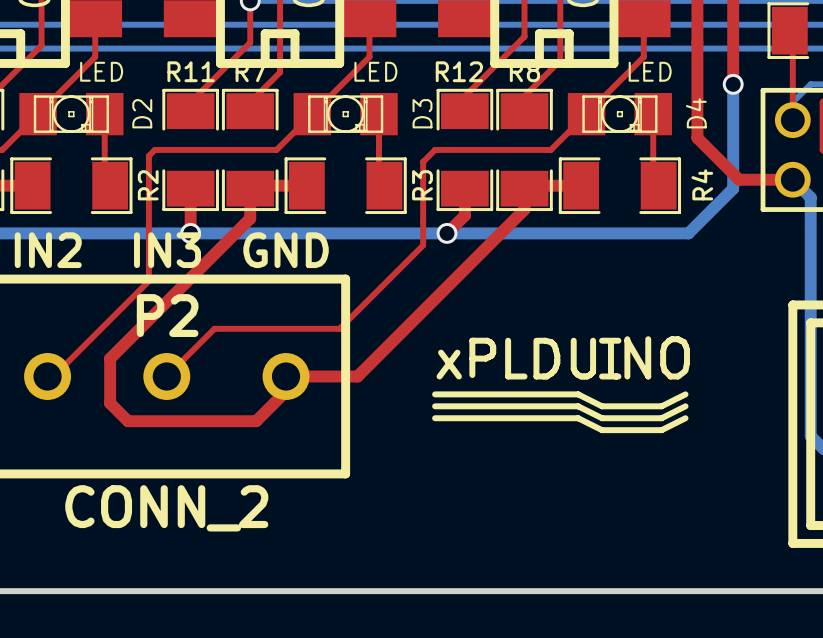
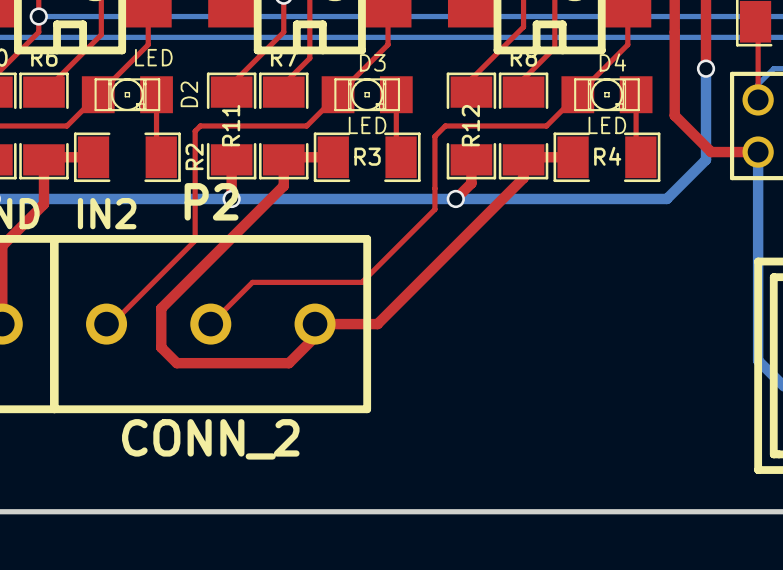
R11 name rotation: 0° (191, 71) -> 90° counterclockwise (231, 125)
R11 name position: R11 (191, 71) -> R11 (231, 125)
D3 value position: LED (375, 71) -> LED (367, 125)
R12 name rotation: 0° (459, 71) -> 90° counterclockwise (470, 125)
R12 name position: R12 (459, 71) -> R12 (470, 125)
D4 value position: LED (650, 71) -> LED (607, 125)
D3 name rotation: 0° (422, 113) -> 90° clockwise (372, 62)
D3 name position: D3 (422, 113) -> D3 (372, 62)
D4 name rotation: 0° (696, 113) -> 90° clockwise (612, 62)
D4 name position: D4 (696, 113) -> D4 (612, 62)
bottom track: (792, 179) (810, 197) (810, 436) -> (758, 152) (758, 360) (773, 376)
R4 name rotation: 0° (702, 184) -> 90° clockwise (607, 156)
R4 name position: R4 (702, 184) -> R4 (607, 156)
R3 name rotation: 0° (422, 185) -> 90° clockwise (367, 156)
R3 name position: R3 (422, 185) -> R3 (367, 156)
text: IN3 (167, 250) -> none
text: GND (286, 250) -> none
P2 name position: P2 (167, 315) -> P2 (211, 201)
drawing: [432, 336, 690, 434] -> none

